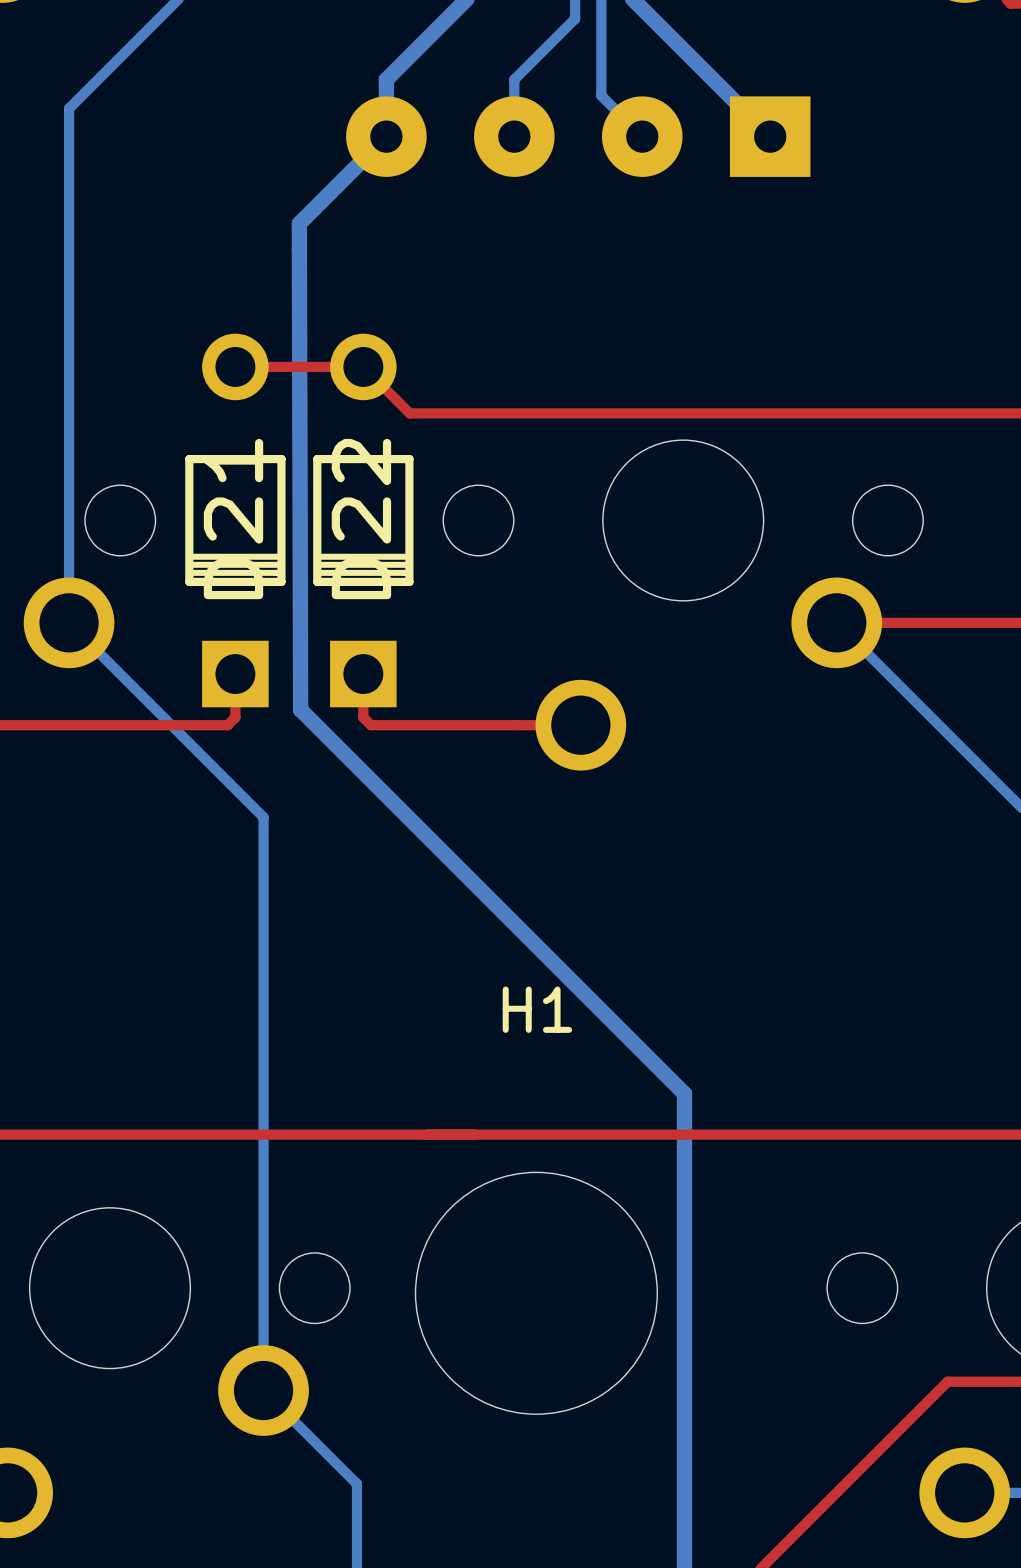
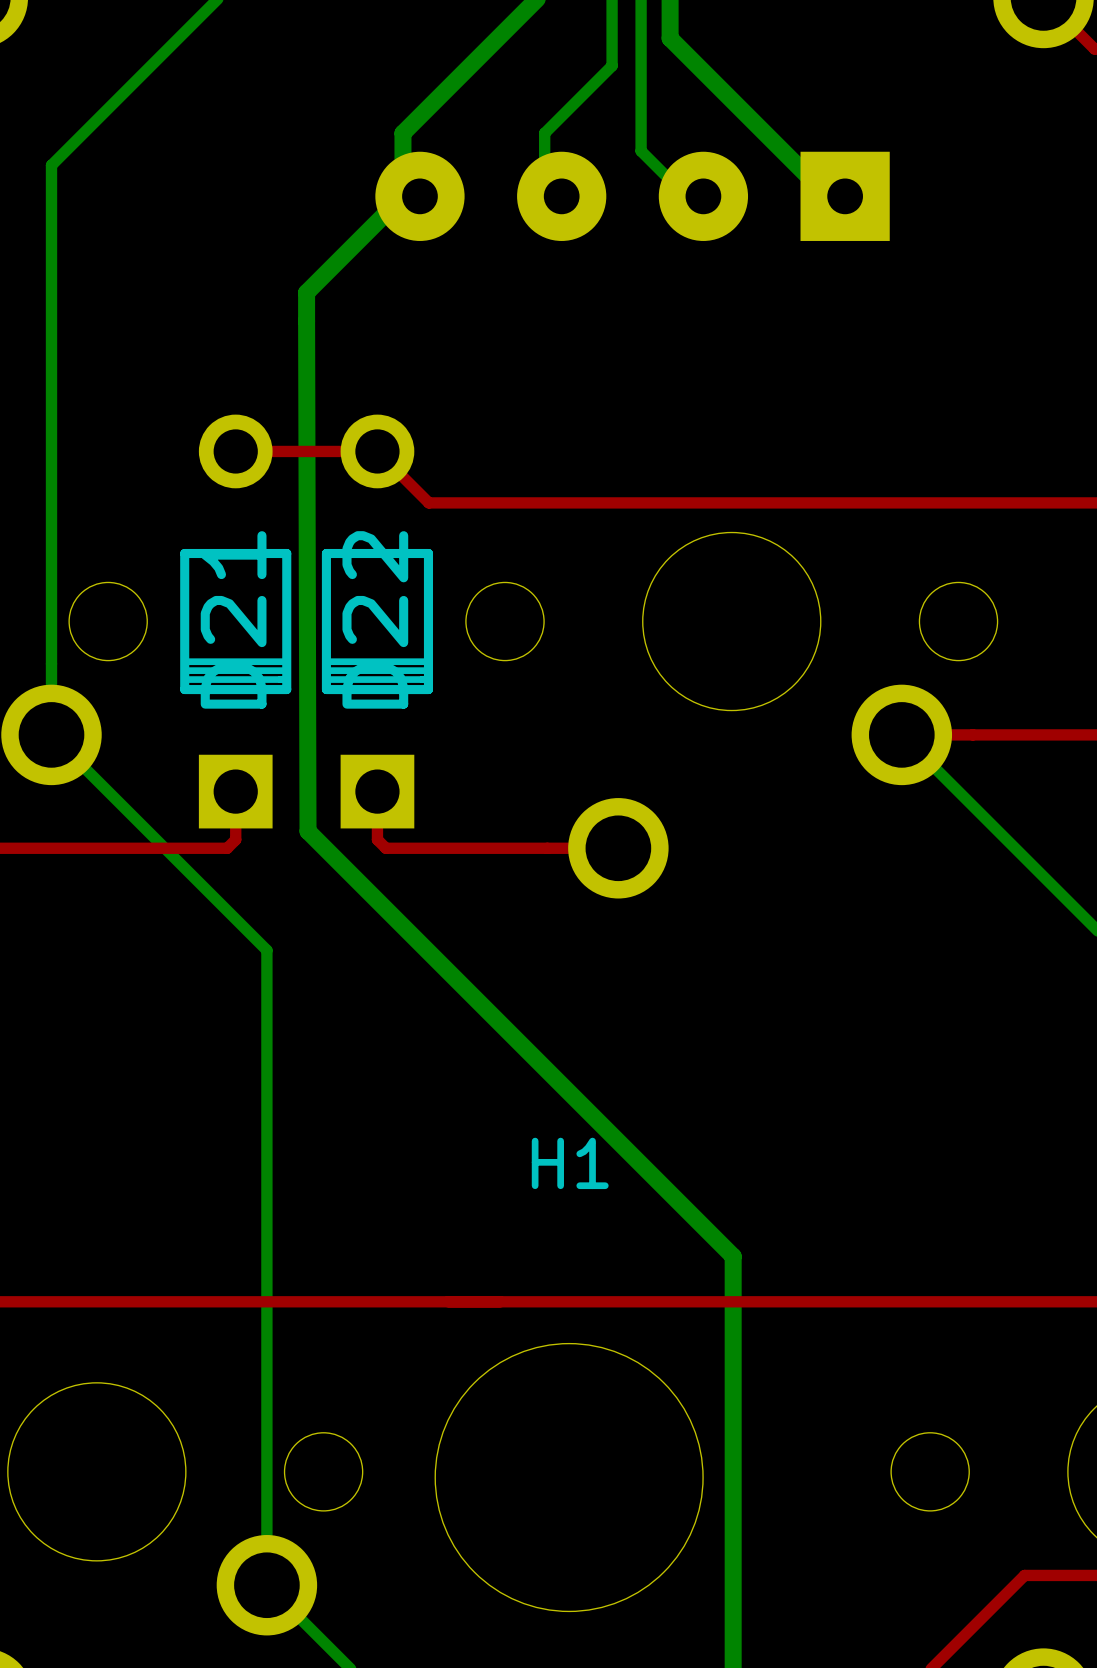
part position: (578, 136) -> (632, 196)

